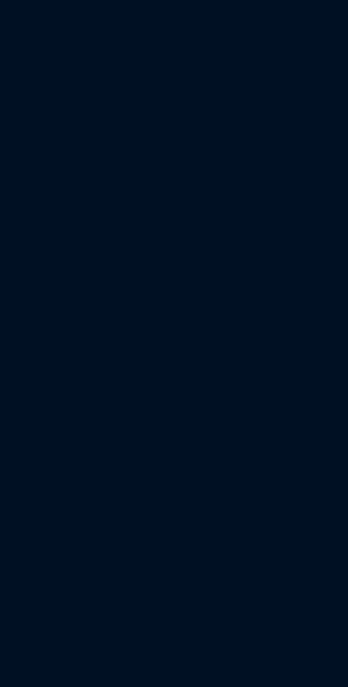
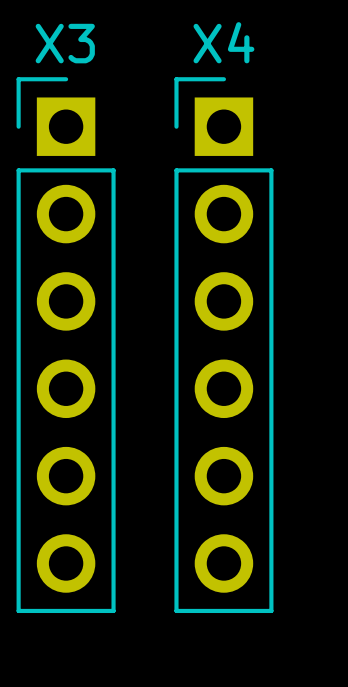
X3: none -> (66, 345)
X4: none -> (223, 345)

